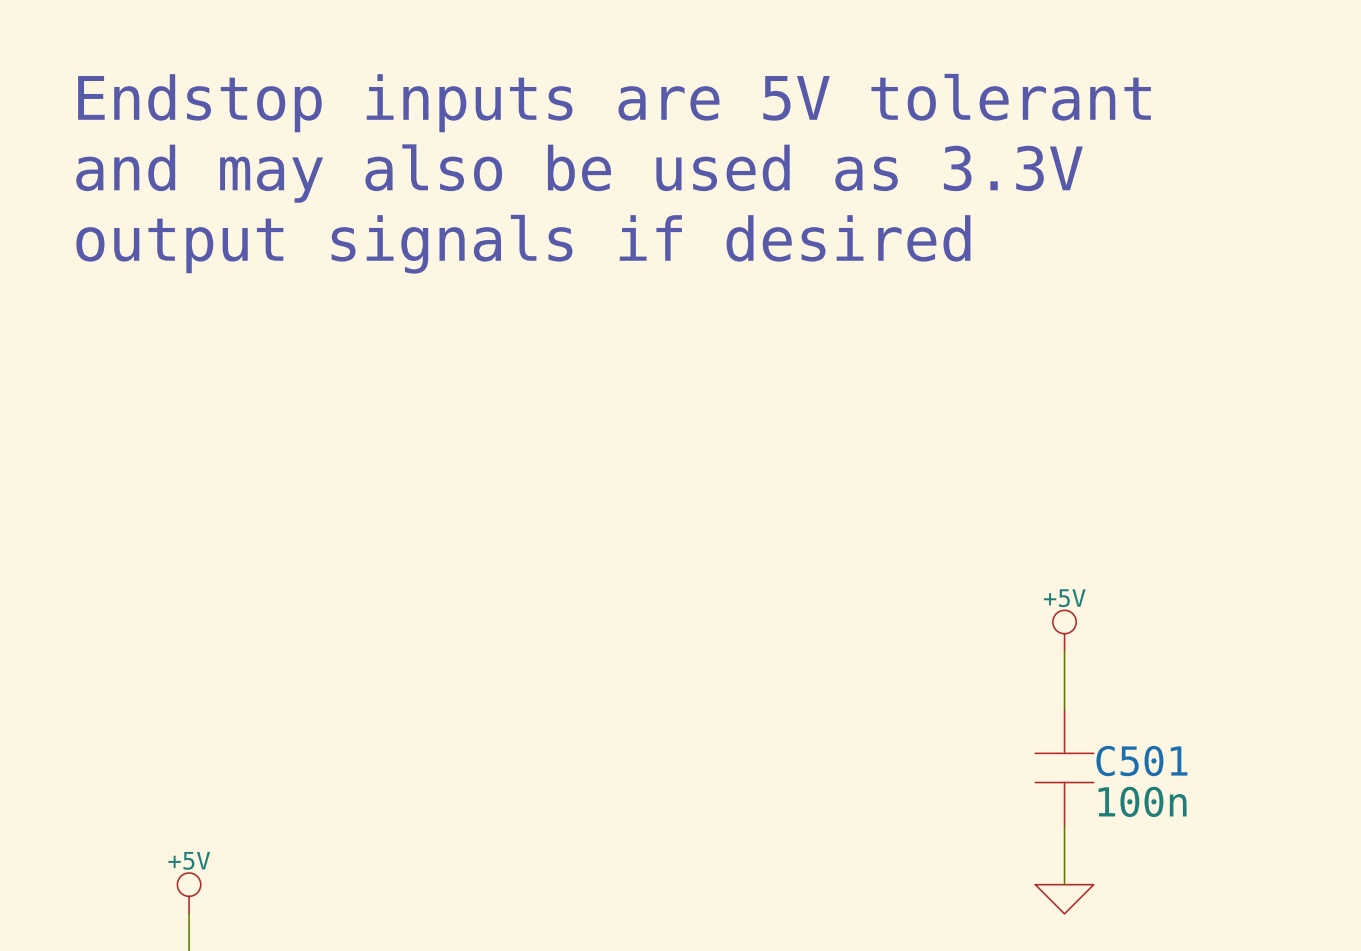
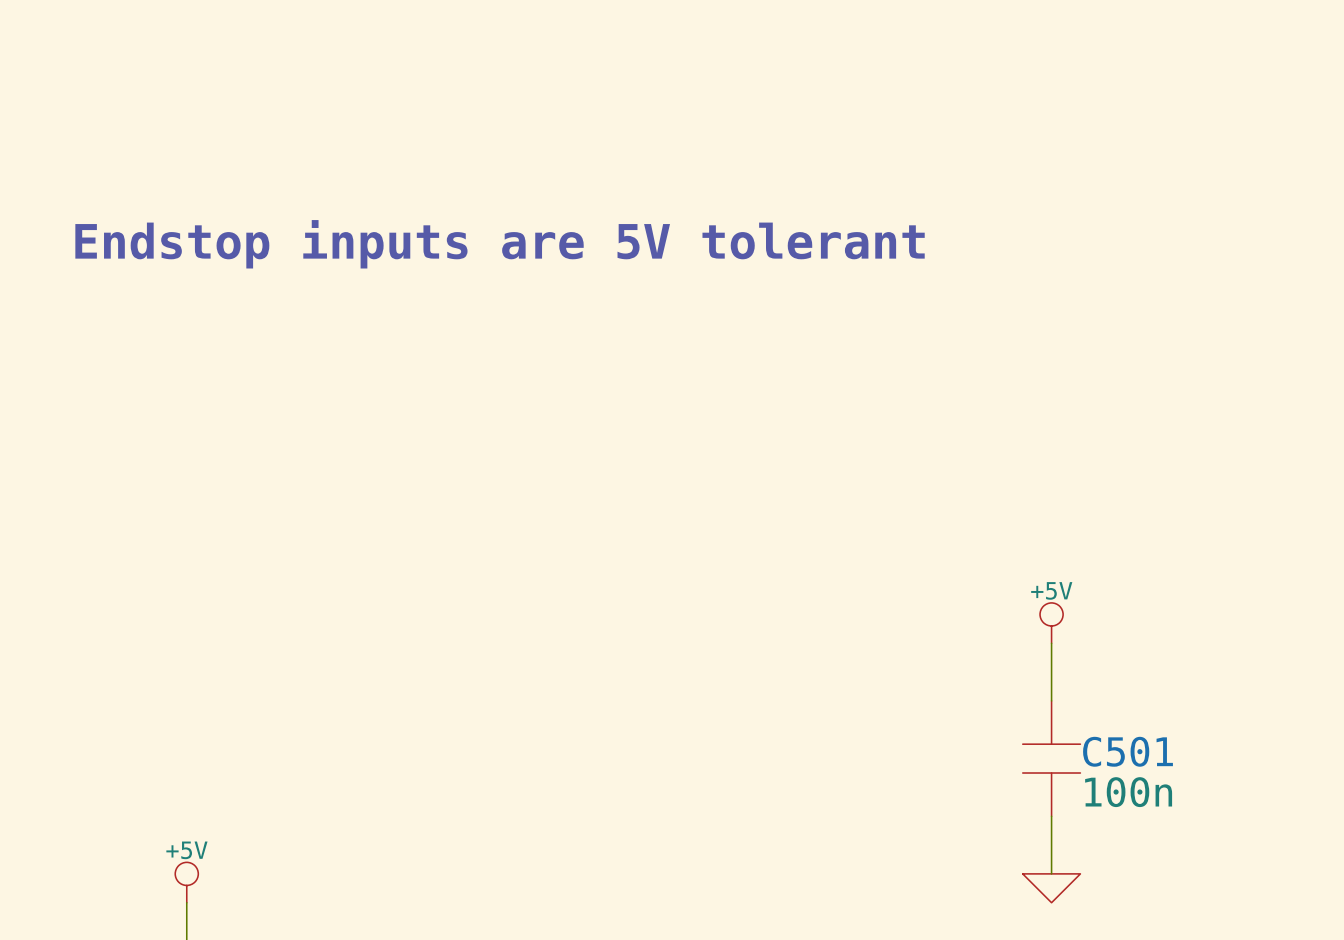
text: Endstop inputs are 5V tolerant (614, 103) -> none
text: and may also be used as 3.3V (579, 173) -> none
text: output signals if desired (523, 244) -> Endstop inputs are 5V tolerant (500, 244)

